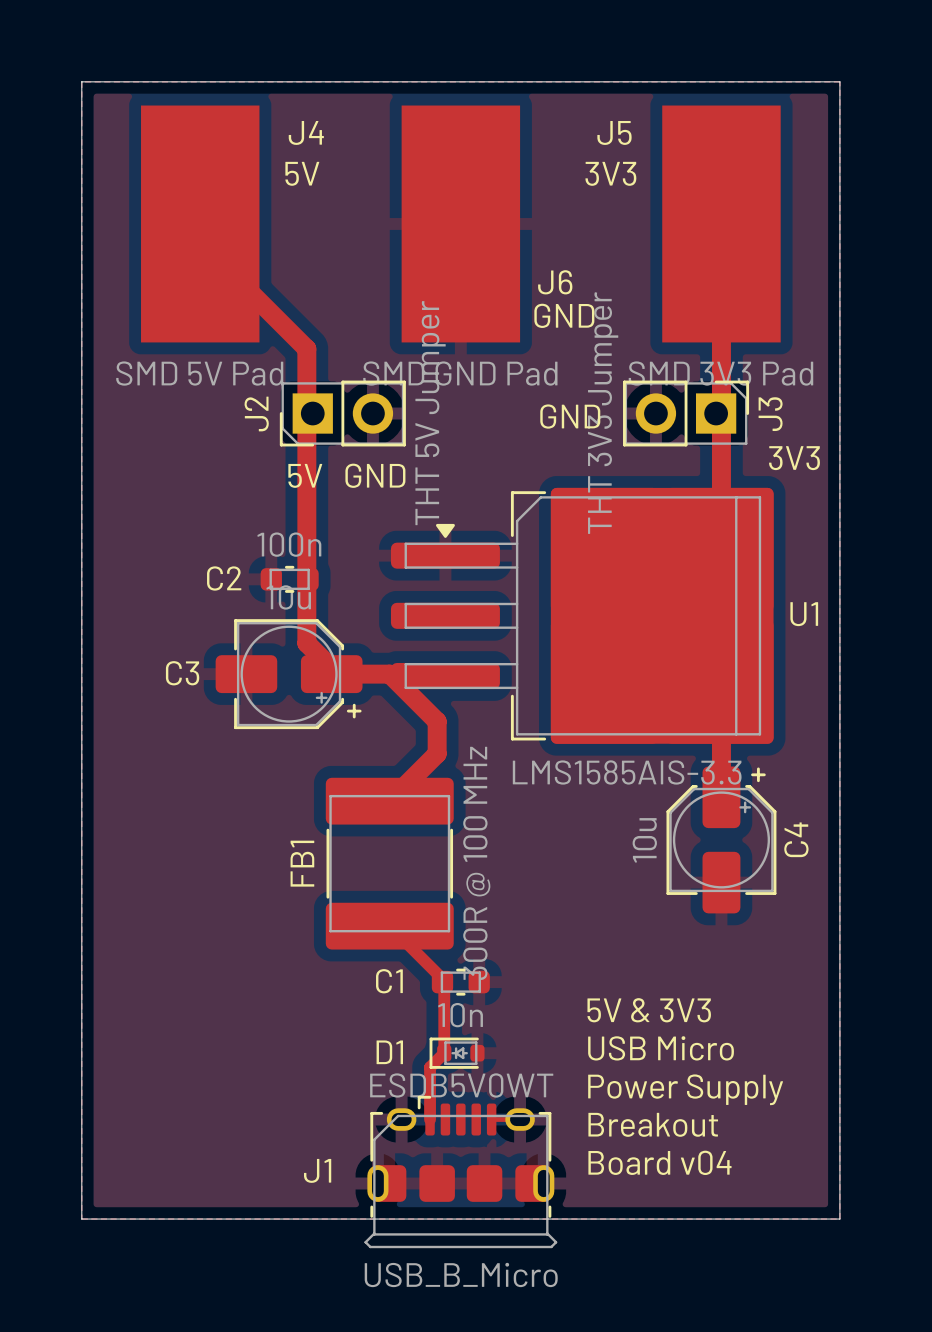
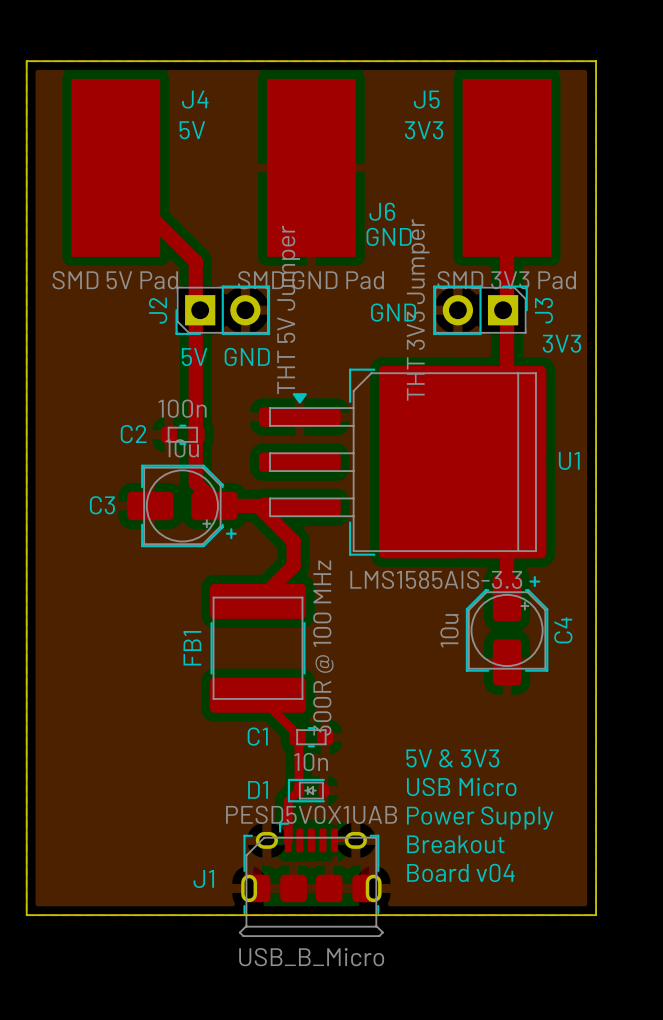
D1 value: ESDB5V0WT (461, 1085) -> PESD5V0X1UAB (311, 814)

